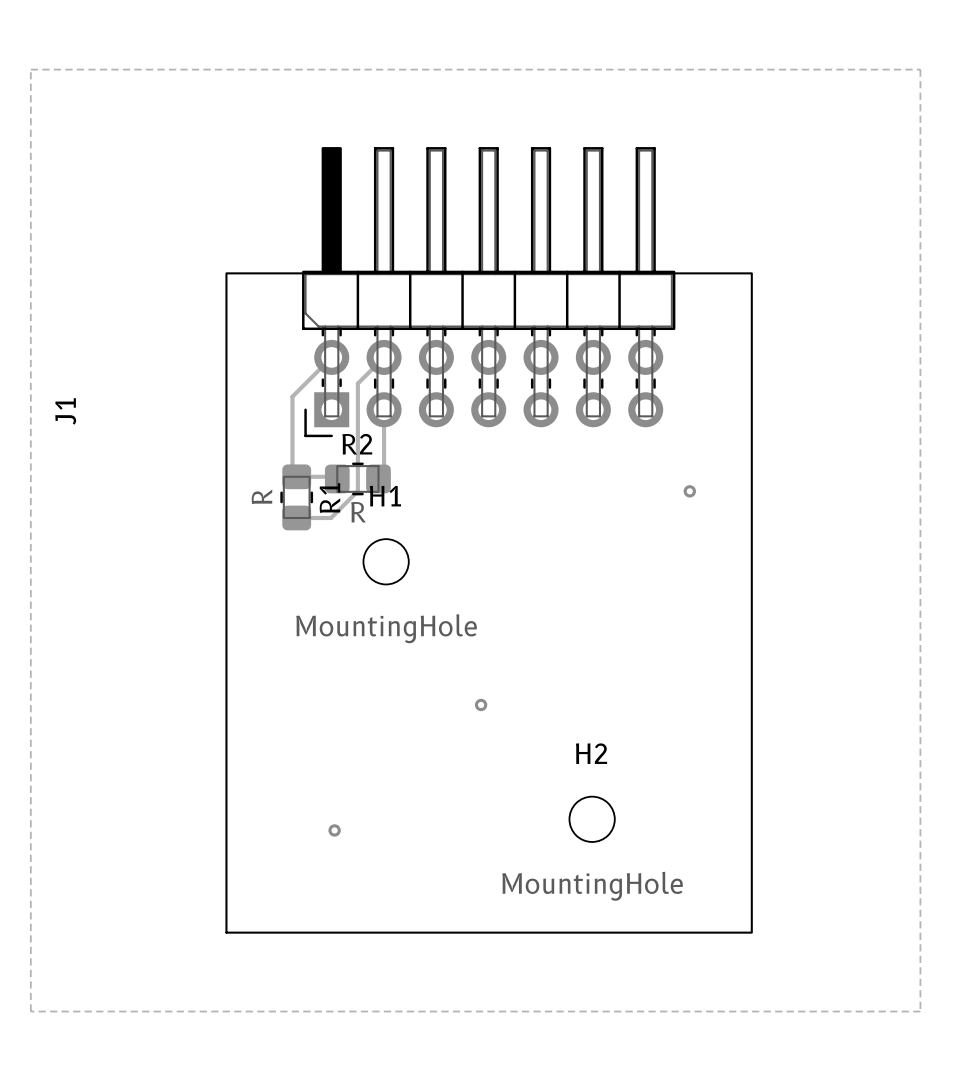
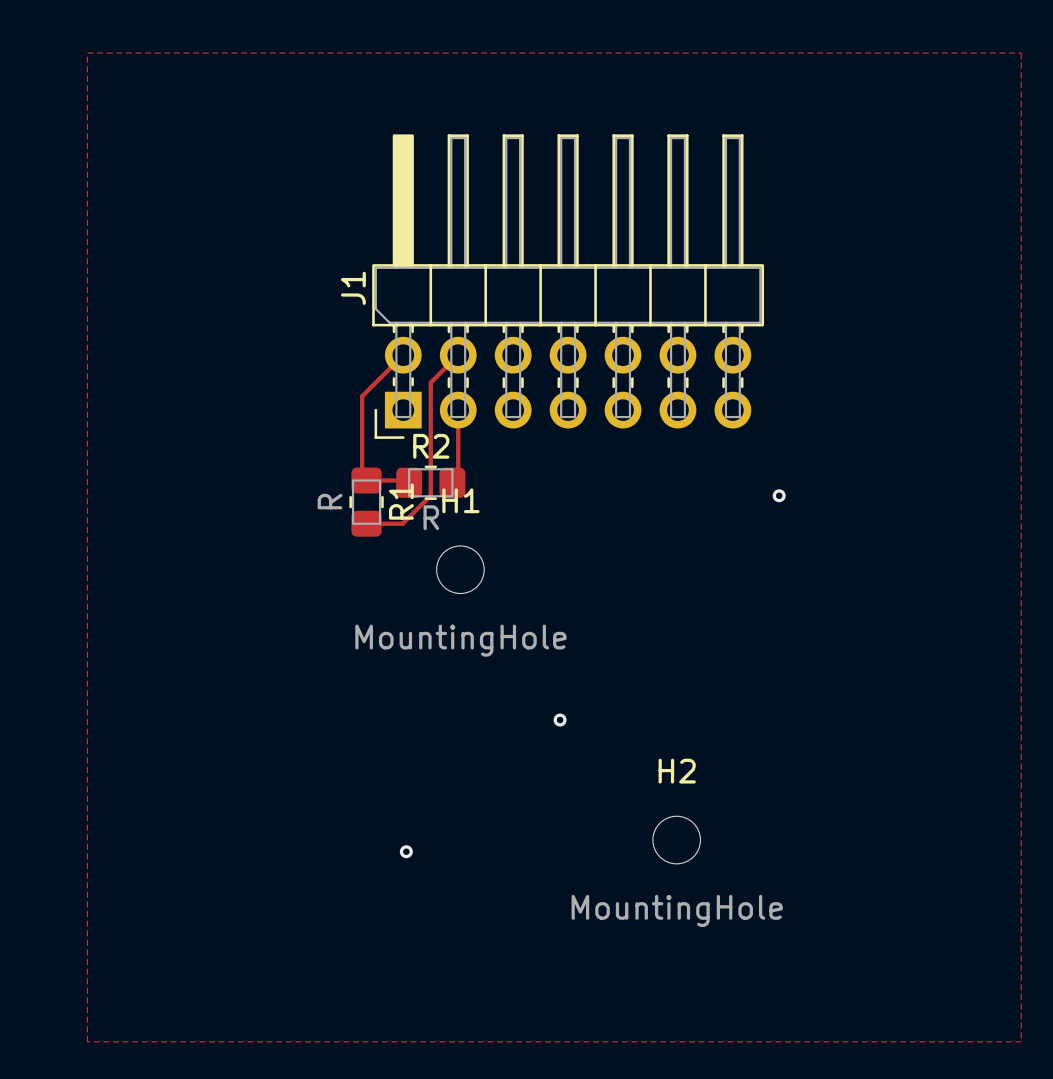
J1 footprint: [225, 147, 753, 934] -> [372, 134, 765, 439]
J1 name position: J1 (65, 411) -> J1 (353, 288)

